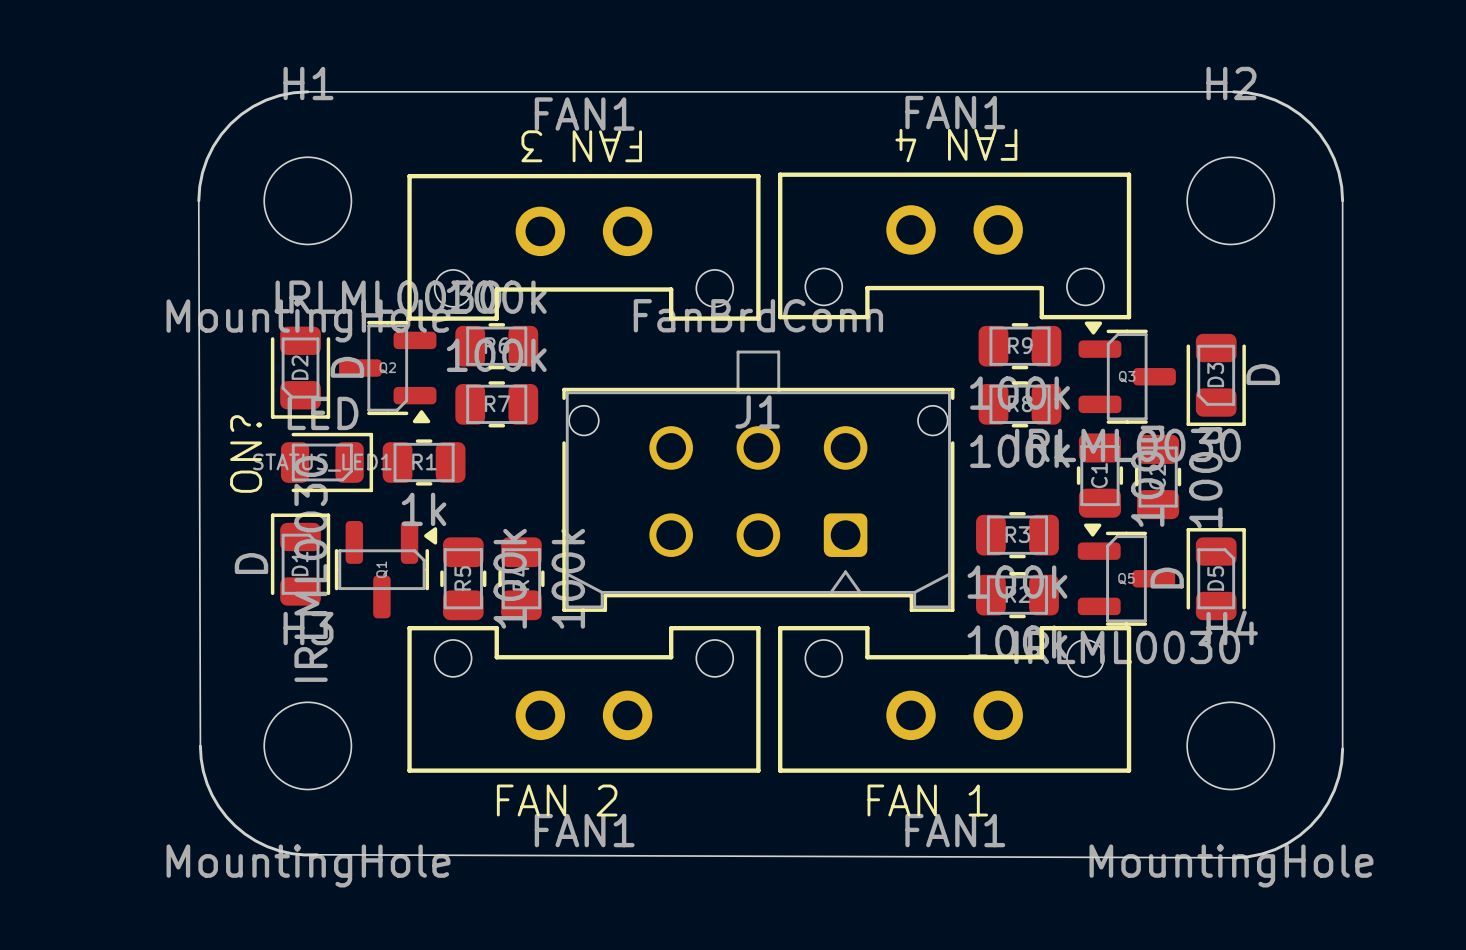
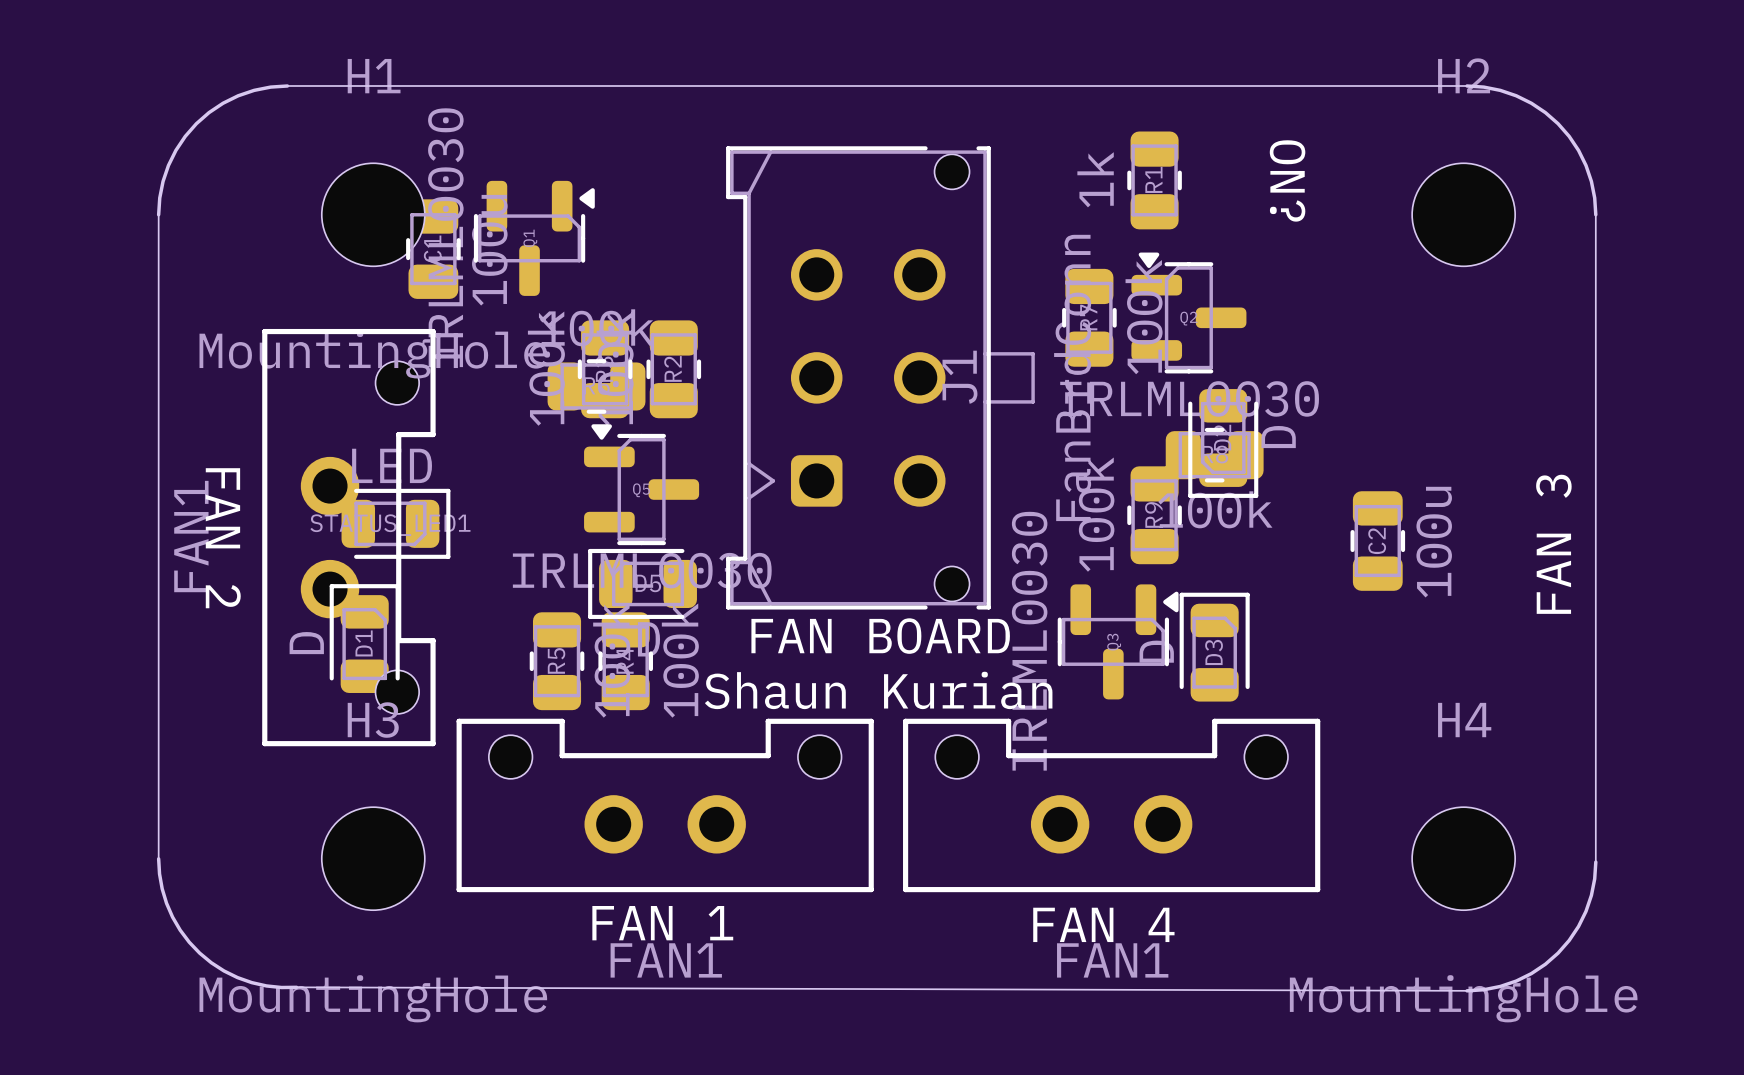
board edge: (307, 91) (279, 95) (266, 100) (241, 114) (230, 123) (213, 146) (202, 172) (199, 186) (200, 746) (207, 783) (218, 806) (235, 825) (267, 846) (304, 854) (1233, 857) -> (373, 85) (270, 87) (238, 95) (209, 112) (196, 123) (175, 150) (163, 181) (158, 214) (158, 858) (159, 873) (166, 903) (180, 930) (199, 953) (211, 962) (237, 977) (266, 985) (281, 987) (1467, 990)
text rotation: 0° (956, 145) -> 180° (1103, 924)
text position: FAN 4 (956, 145) -> FAN 4 (1103, 924)
text: FAN 3 (581, 146) -> none
text: none -> ON? (1287, 180)
part: FAN1 (954, 245) -> none
part: FAN1 (583, 247) -> none
R9 rotation: 0° (1020, 346) -> 90° clockwise (1154, 515)
R9 position: (1020, 346) -> (1154, 515)
D2 position: (300, 372) -> (1223, 443)
Q2 rotation: 0° (387, 372) -> 180° (1188, 312)
Q2 position: (387, 372) -> (1188, 312)
Q3 rotation: 0° (1127, 372) -> 90° clockwise (1118, 641)
Q3 position: (1127, 372) -> (1118, 641)
D3 rotation: 0° (1216, 379) -> 180° (1214, 647)
D3 position: (1216, 379) -> (1214, 647)
R7 rotation: 0° (496, 404) -> 90° clockwise (1089, 317)
R7 position: (496, 404) -> (1089, 317)
text: ON? (246, 454) -> none
R1 rotation: 0° (424, 462) -> 90° clockwise (1154, 180)
R1 position: (424, 462) -> (1154, 180)
part: none -> FAN1 (348, 537)
text: none -> FAN 3 (1553, 544)
C1 position: (1099, 475) -> (433, 249)
text: none -> FAN 2 (223, 538)
J1 rotation: 0° (758, 481) -> 90° clockwise (880, 377)
R3 rotation: 0° (1017, 535) -> 90° clockwise (605, 369)
R3 position: (1017, 535) -> (605, 369)
text: none -> FAN BOARD (880, 636)
Q1 position: (386, 569) -> (534, 238)
Q5 position: (1126, 574) -> (641, 484)
D5 rotation: 0° (1216, 574) -> 90° counterclockwise (642, 583)
D5 position: (1216, 574) -> (642, 583)
R2 rotation: 0° (1017, 595) -> 90° clockwise (673, 369)
R2 position: (1017, 595) -> (673, 369)
text: none -> Shaun Kurian (878, 690)
part position: (583, 699) -> (665, 805)
part position: (954, 699) -> (1111, 805)
text: FAN 2 (557, 800) -> FAN 1 (662, 923)
text: FAN 1 (927, 800) -> none

